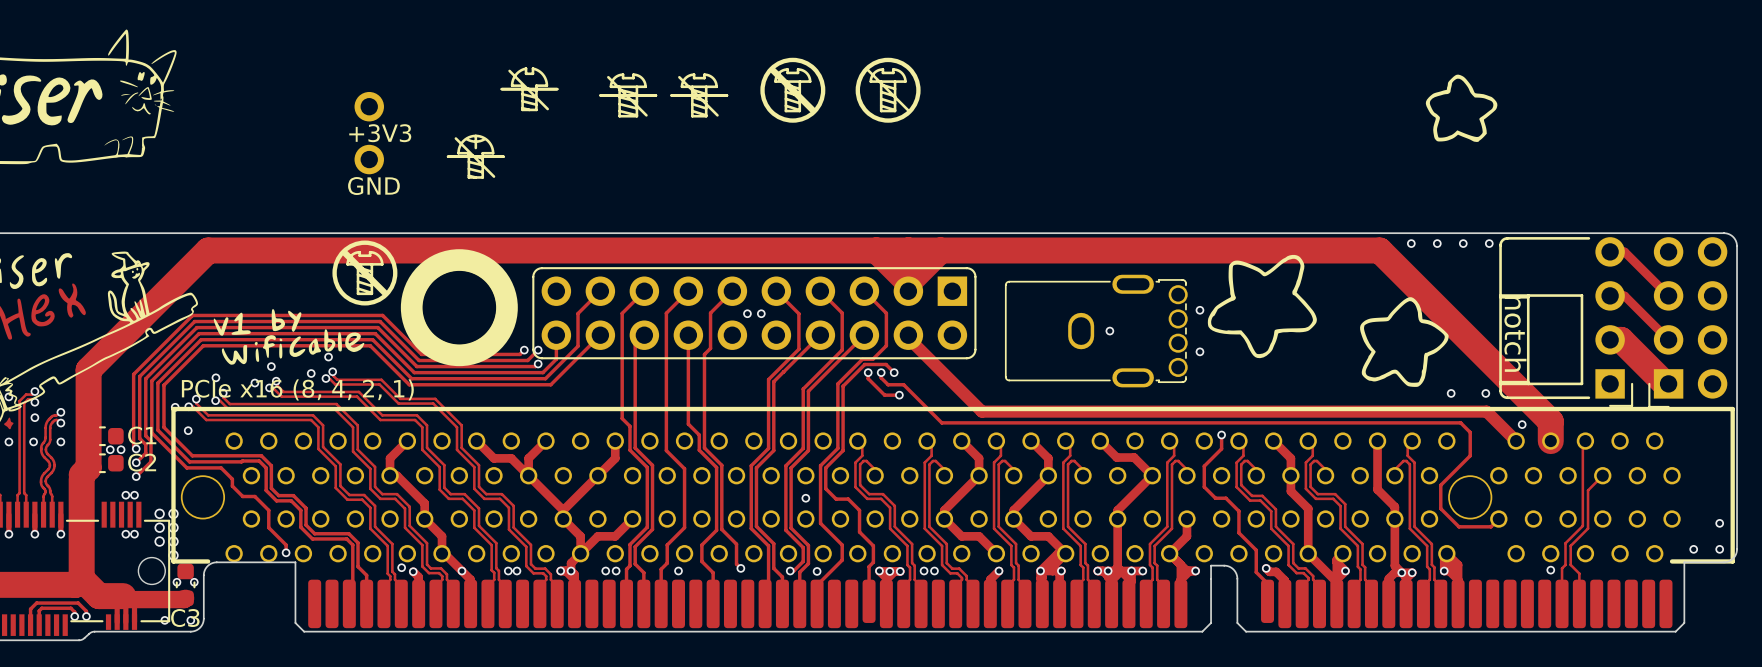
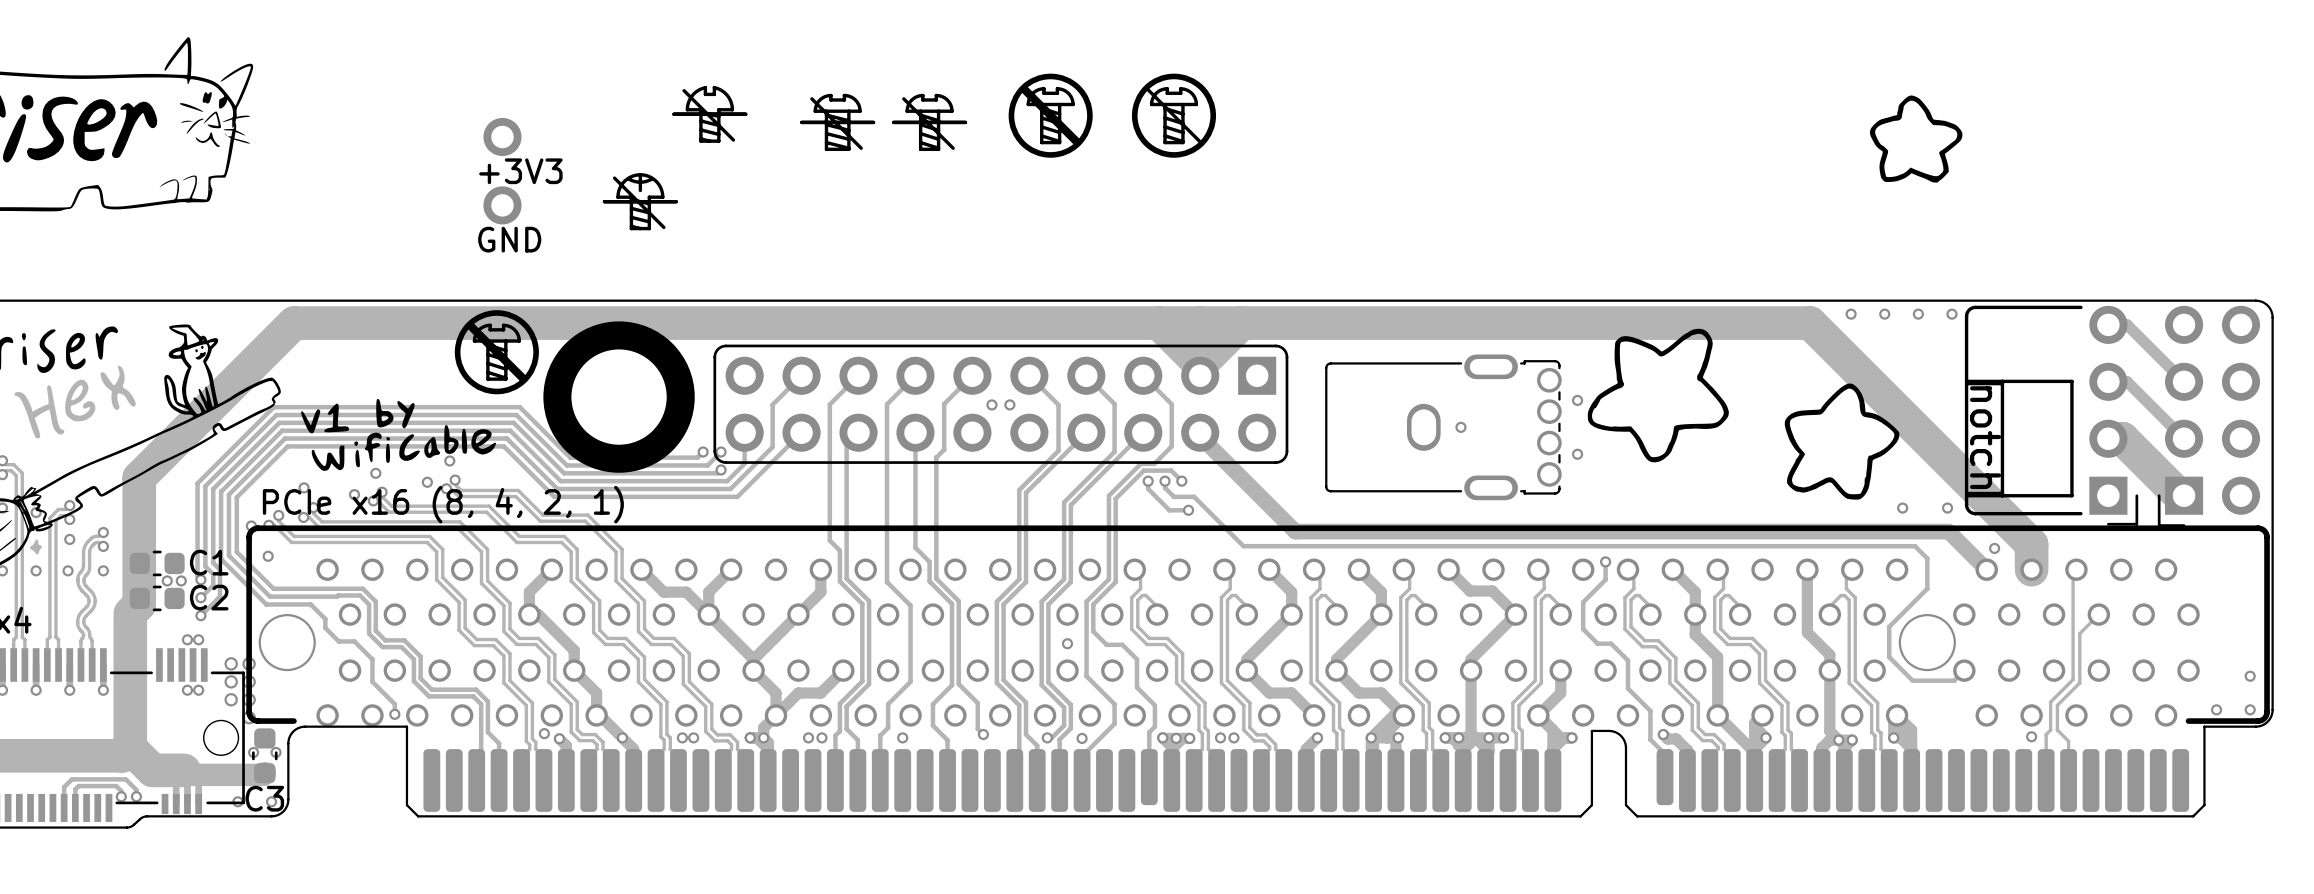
part footprint: [171, 406, 1735, 564] -> [246, 525, 2270, 727]

